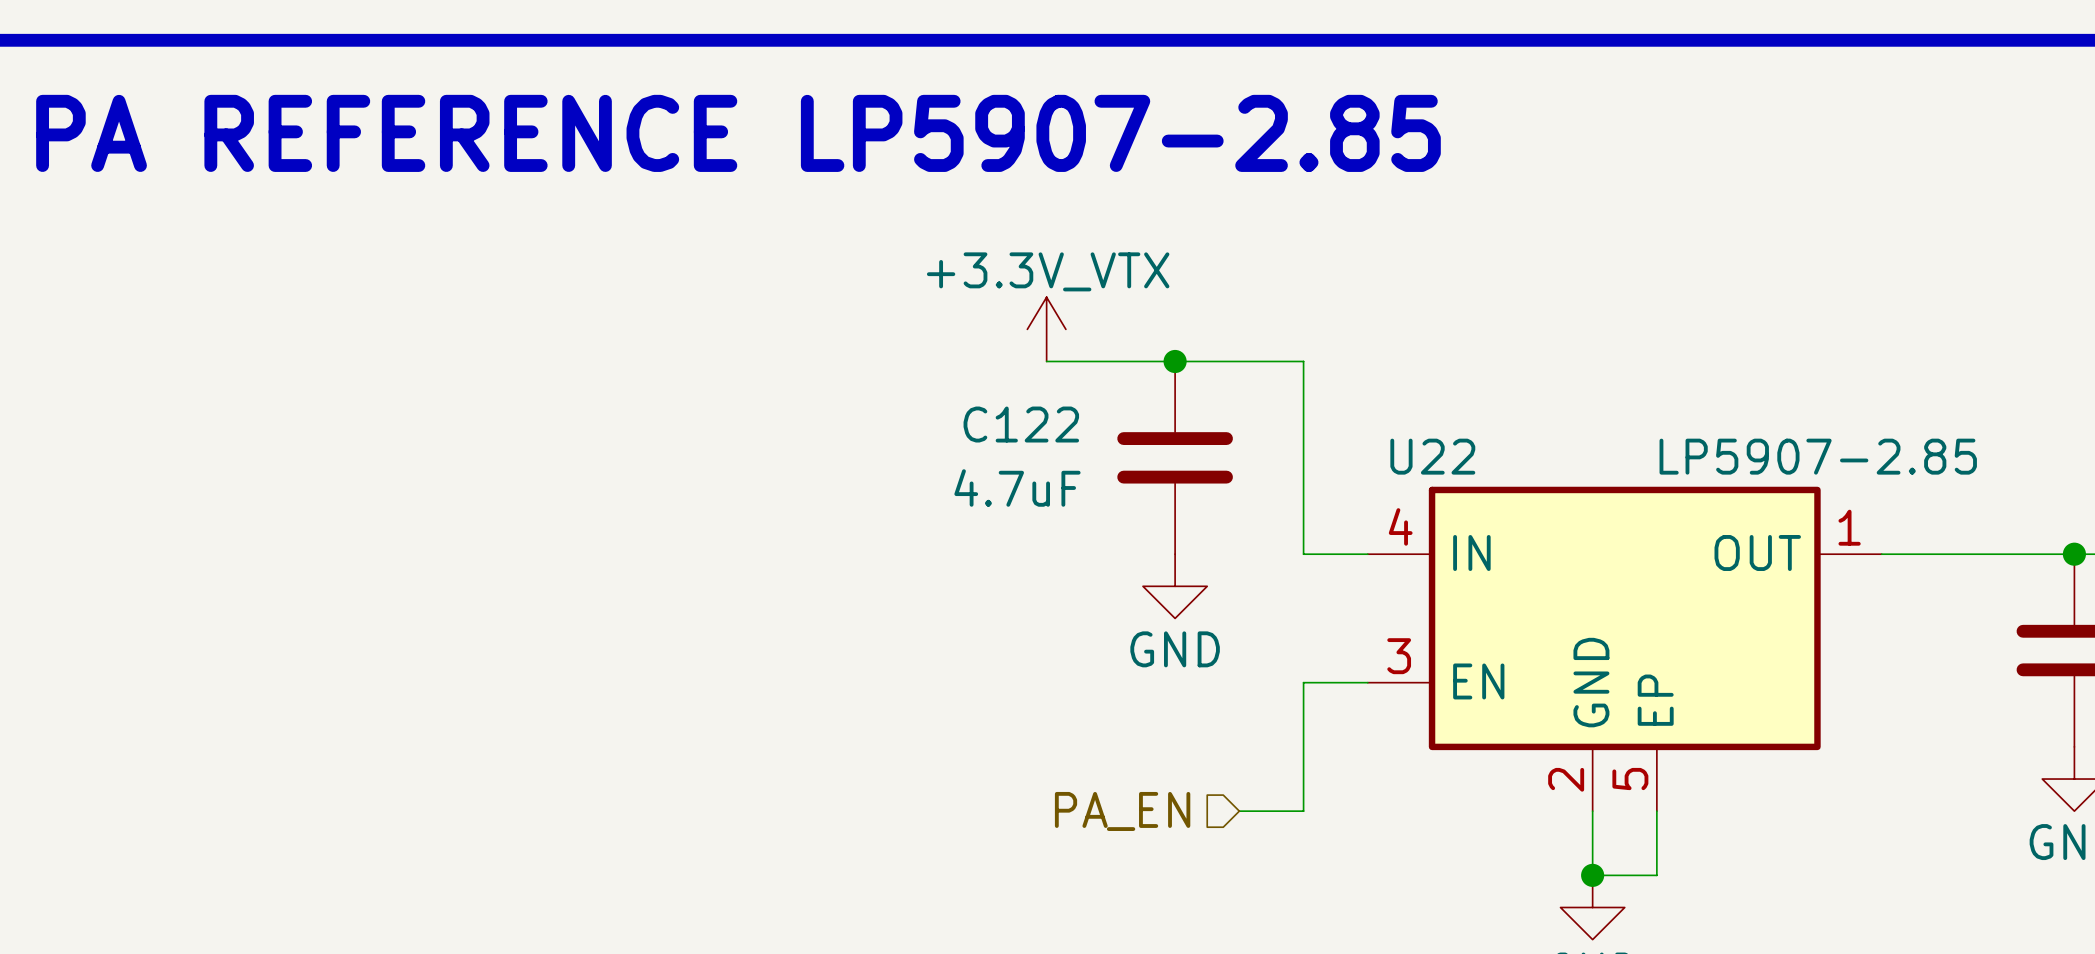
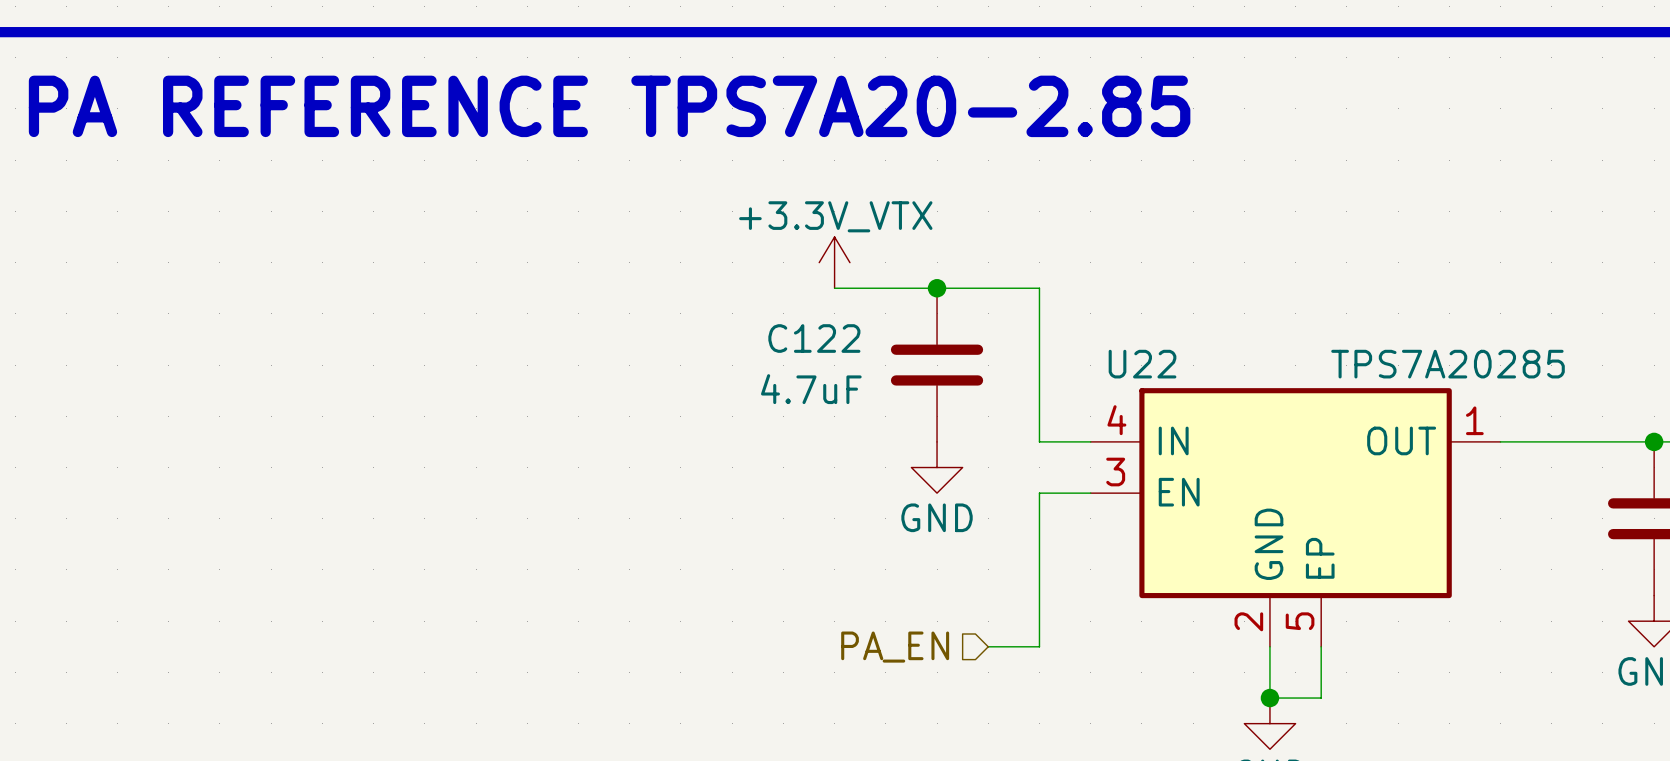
text: PA REFERENCE LP5907-2.85 (738, 133) -> PA REFERENCE TPS7A20-2.85 (609, 106)
U22 value: LP5907-2.85 (1818, 456) -> TPS7A20285 (1448, 364)
U22 symbol: [1367, 486, 1882, 812] -> [1090, 388, 1501, 647]
wire: (1303, 682) (1367, 682) -> (1039, 544) (1039, 493) (1090, 493)

